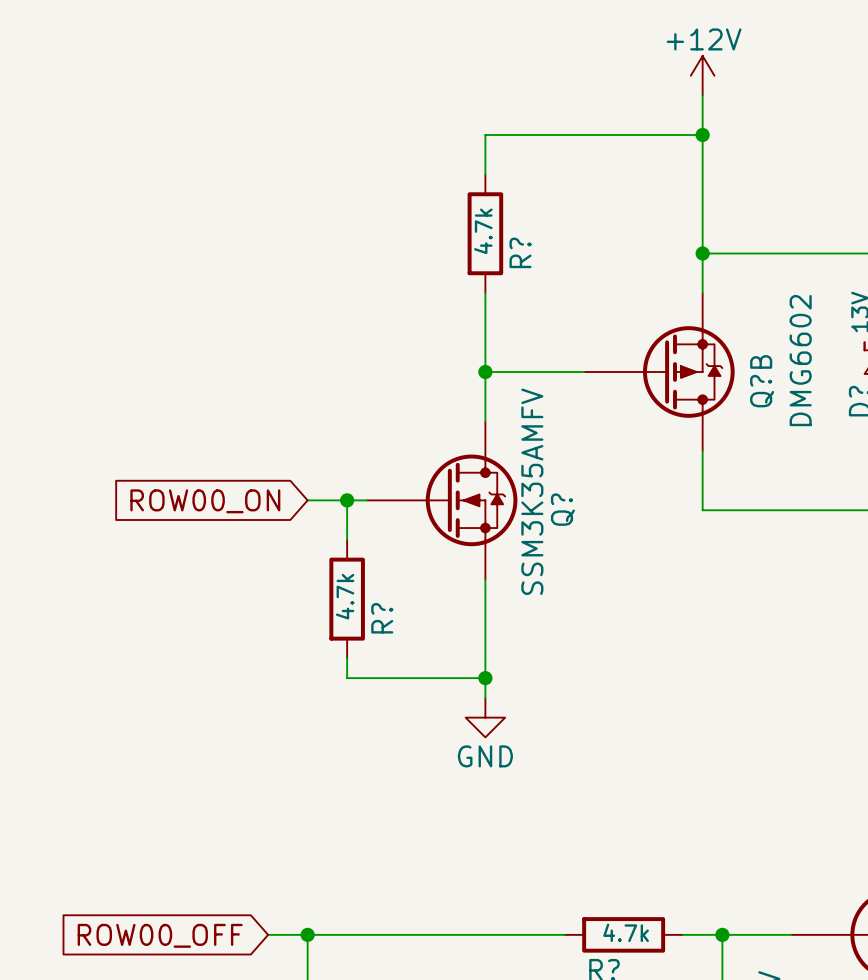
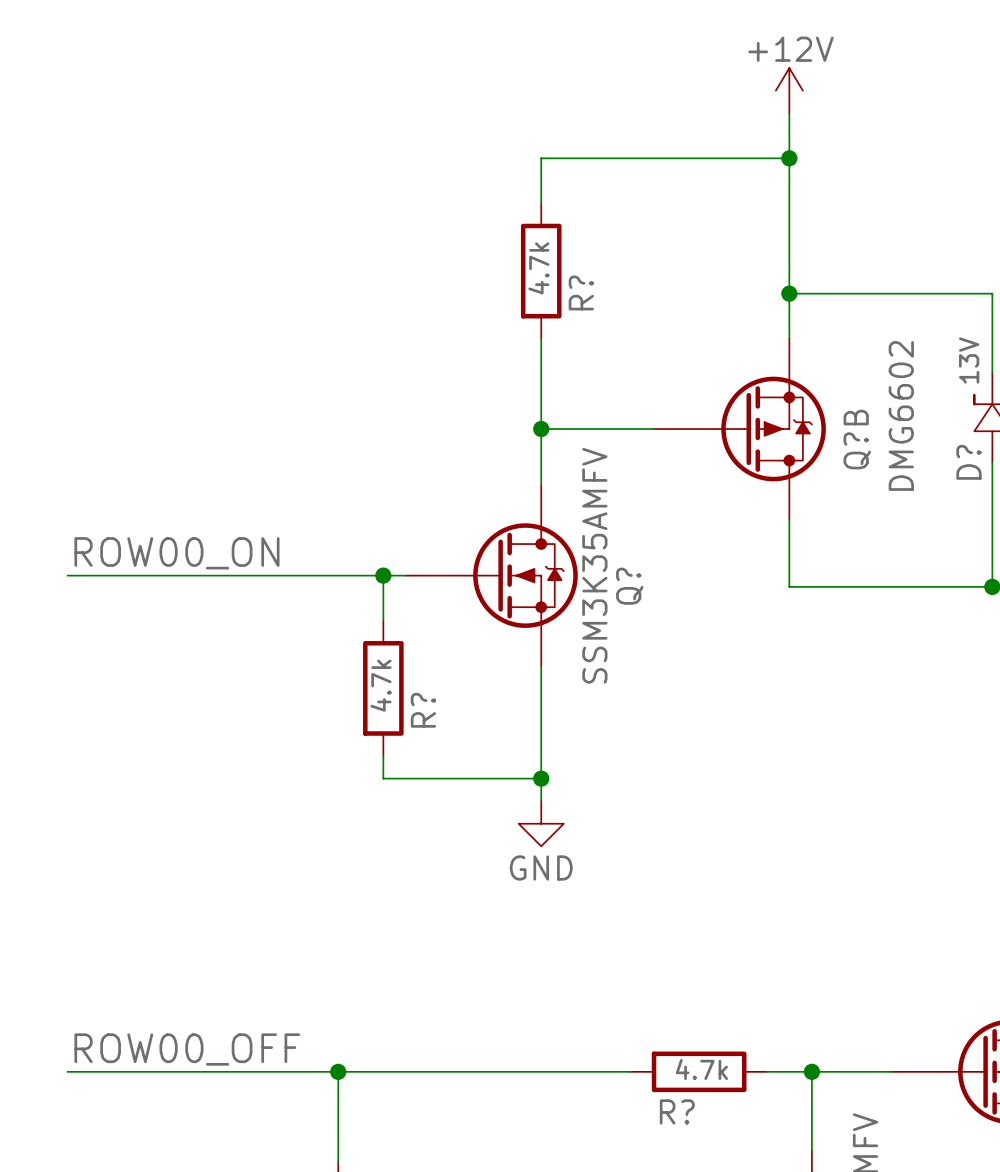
label: none -> ROW00_ON (176, 553)
wire: none -> (67, 575) (338, 575)
global label: ROW00_ON (205, 501) -> none
label: none -> ROW00_OFF (187, 1049)
wire: none -> (67, 1071) (293, 1071)
global label: ROW00_OFF (160, 935) -> none

